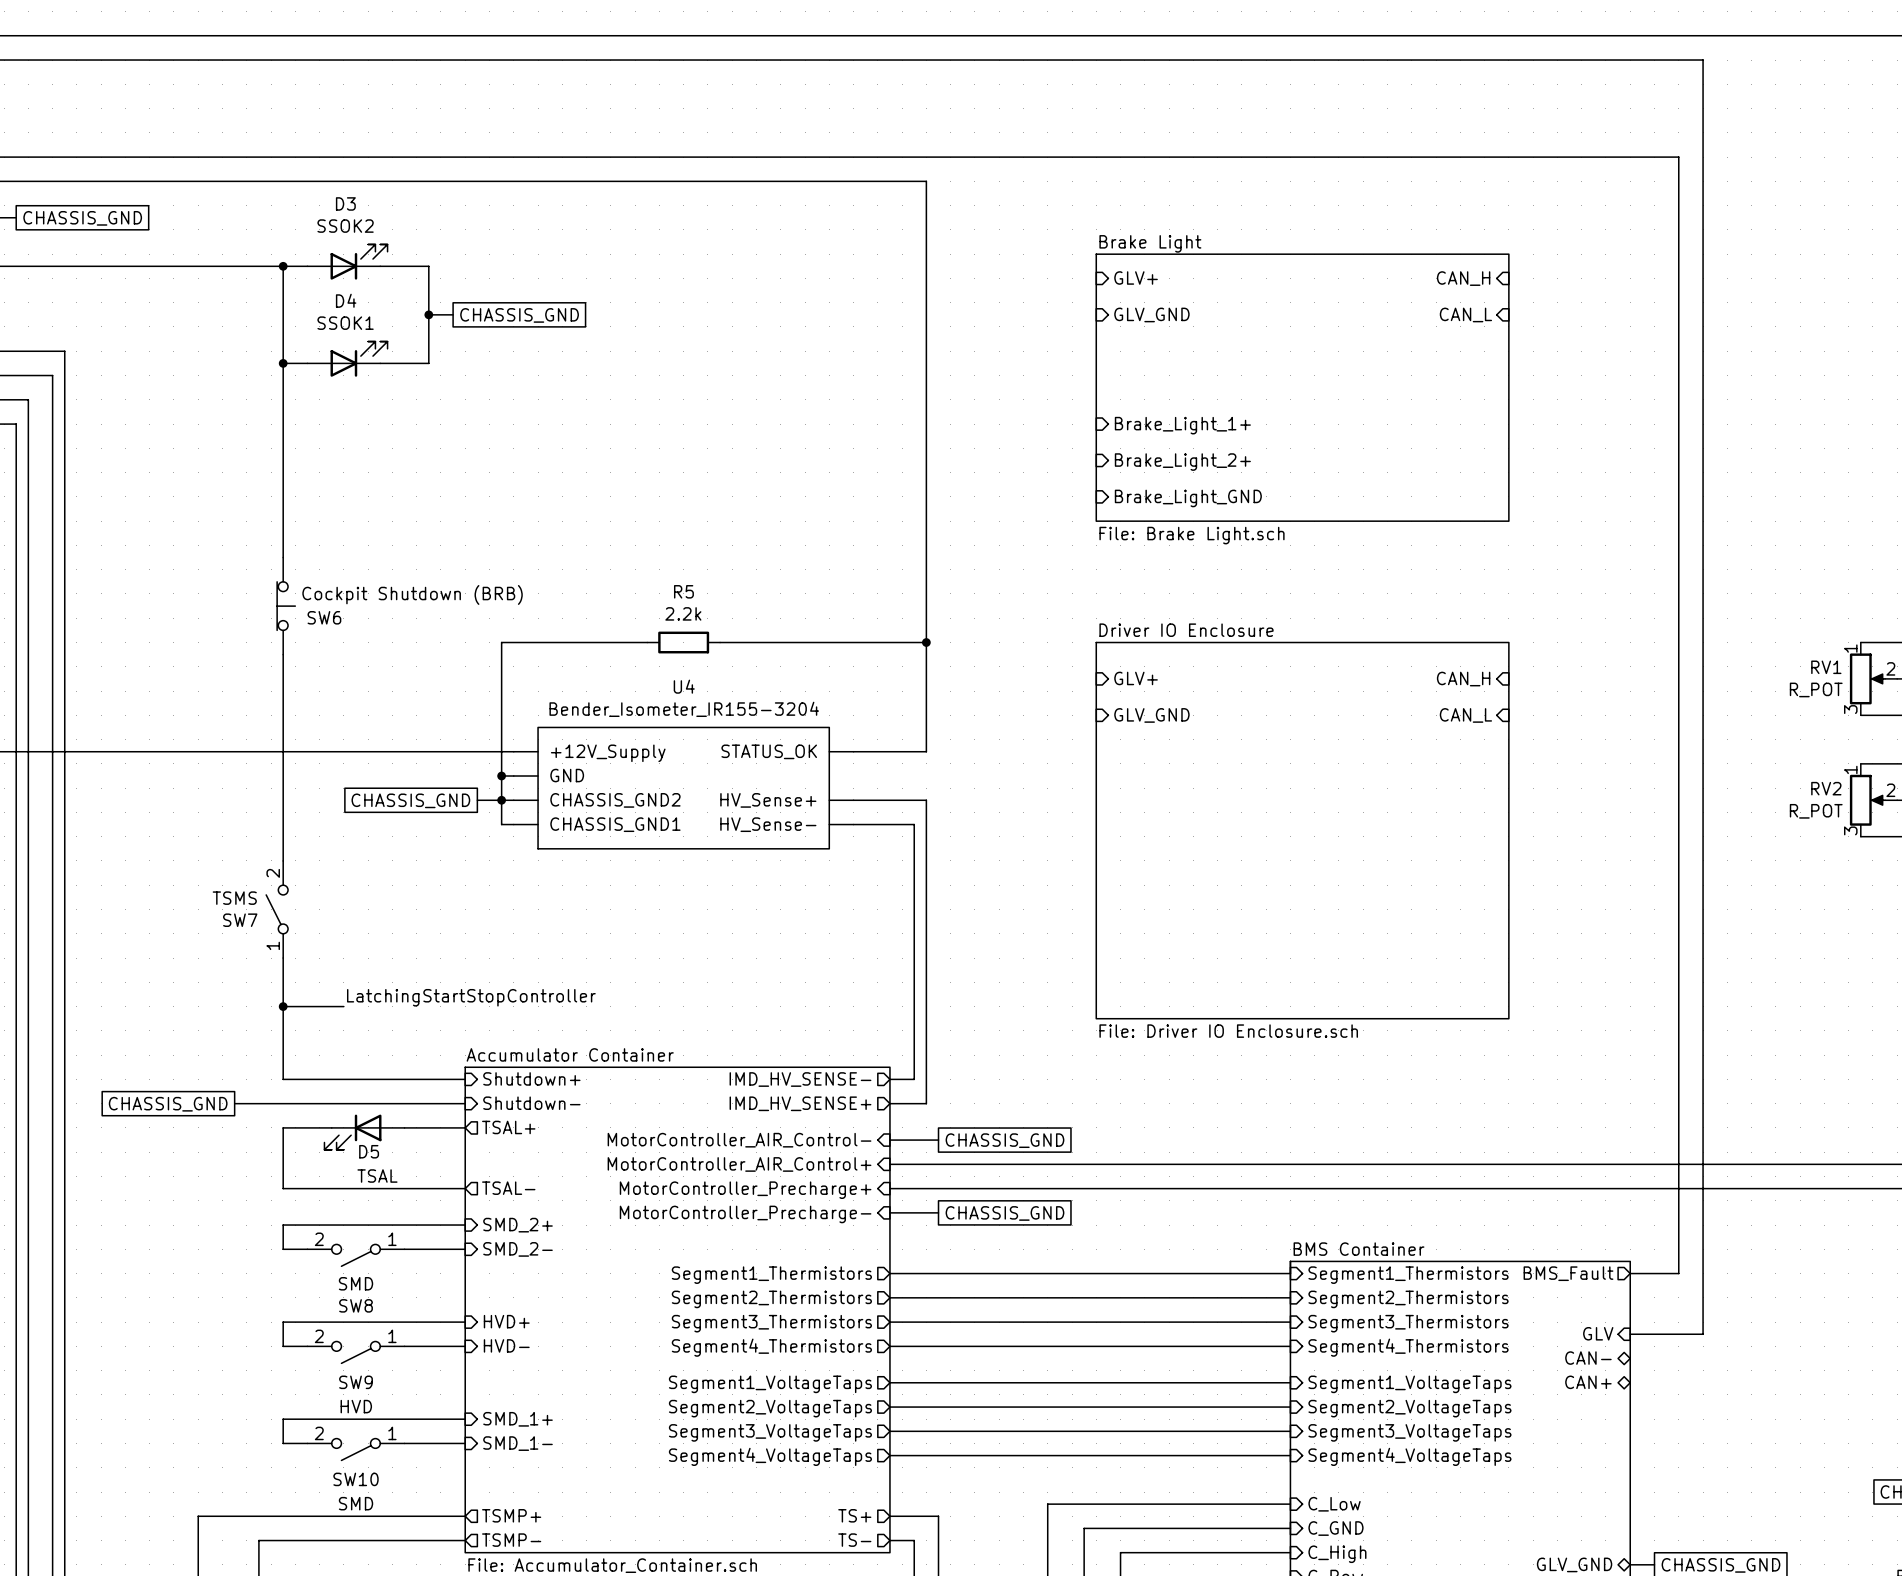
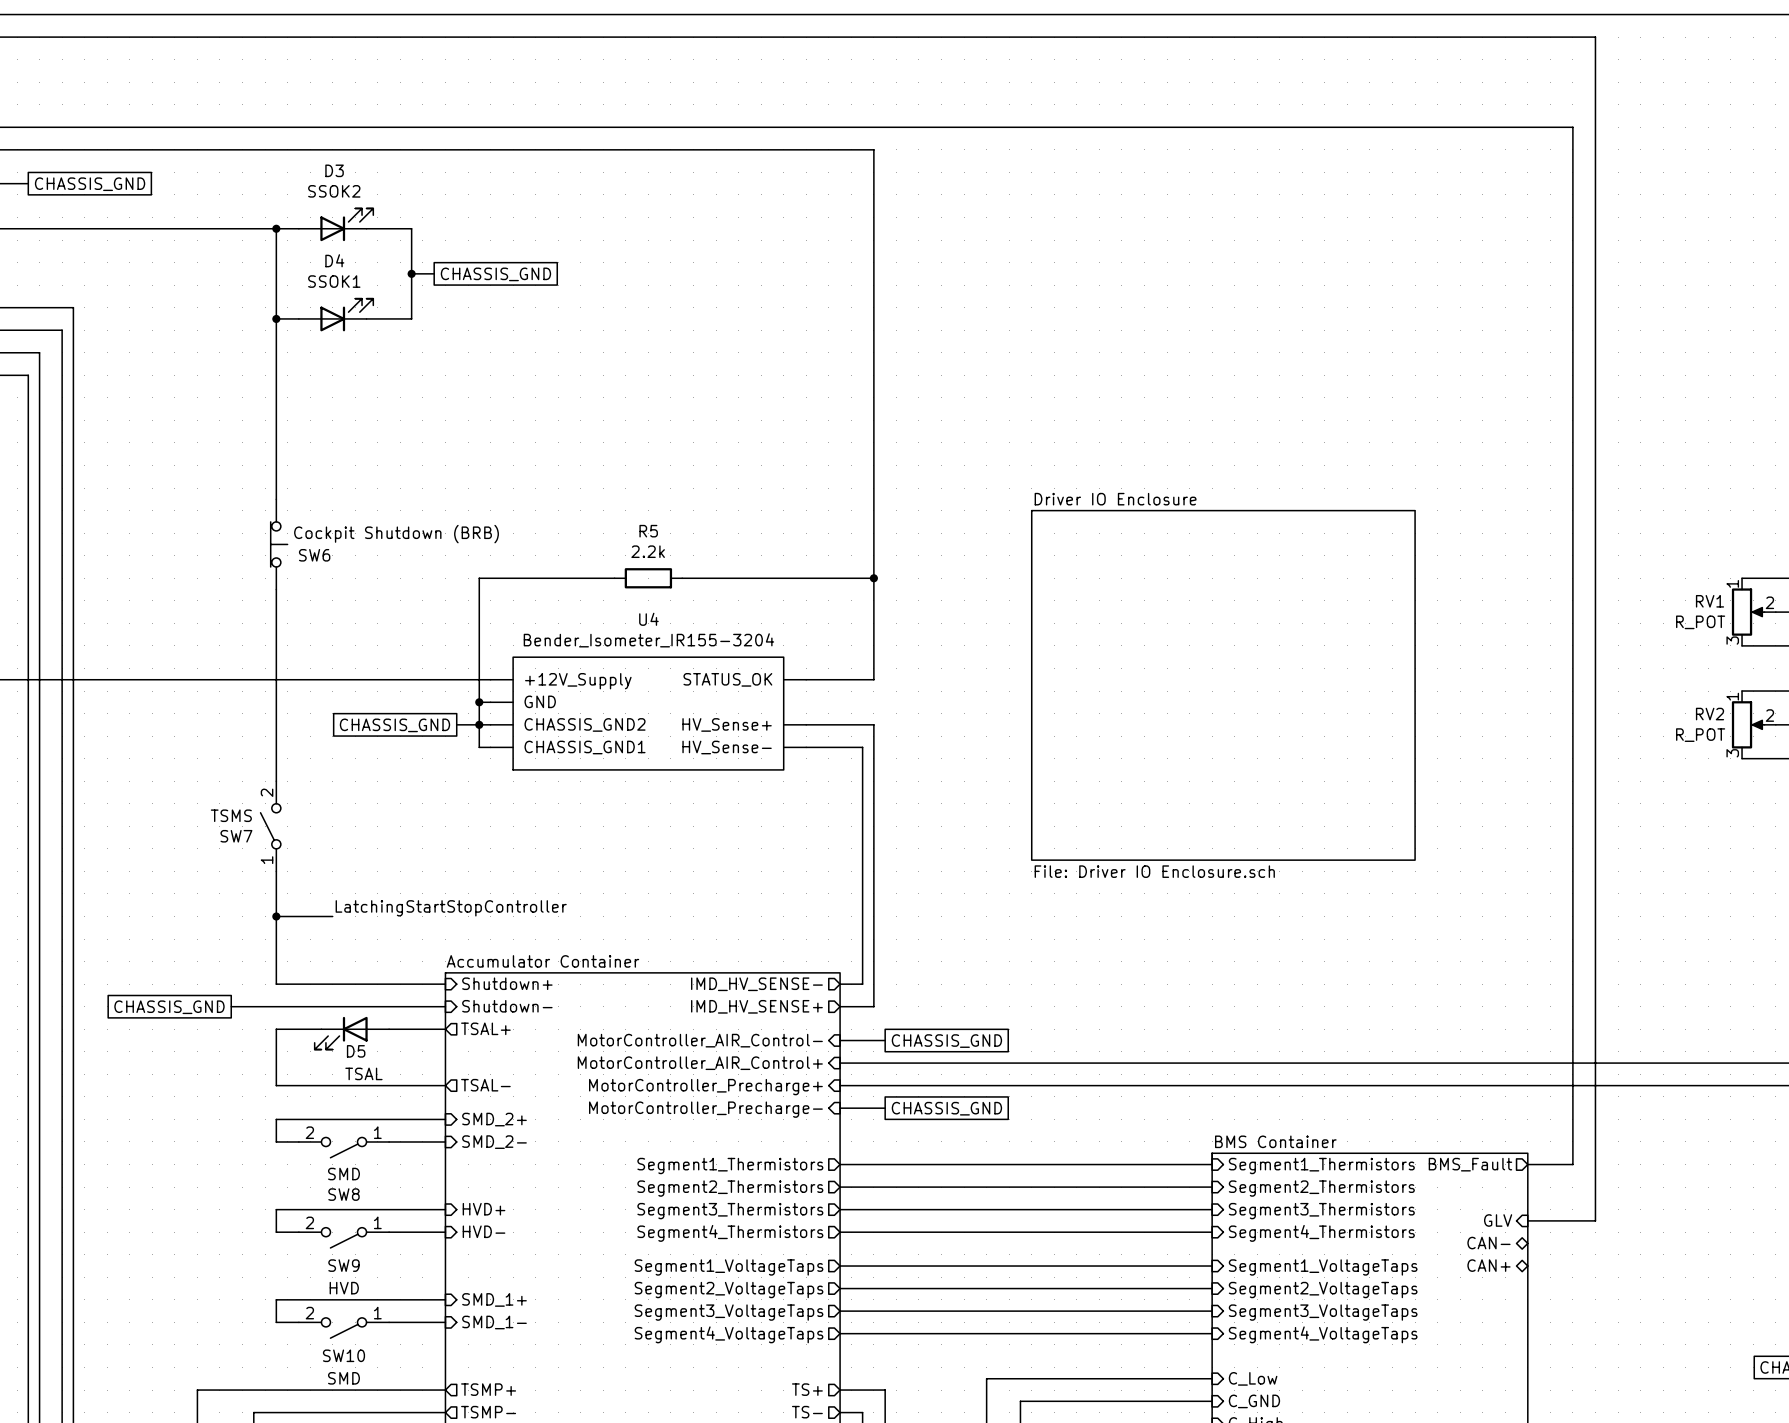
sheet pin: GLV+ (1136, 277) -> none
sheet pin: CAN_H (1463, 278) -> none
sheet pin: GLV_GND (1151, 314) -> none
sheet pin: CAN_L (1465, 314) -> none
sheet Brake Light: File: Brake Light.sch (1302, 387) -> none
sheet pin: Brake_Light_1+ (1182, 425) -> none
sheet pin: Brake_Light_2+ (1182, 462) -> none
sheet pin: Brake_Light_GND (1188, 498) -> none
sheet pin: GLV+ (1136, 678) -> none
sheet pin: CAN_H (1463, 679) -> none
sheet pin: GLV_GND (1151, 715) -> none
sheet pin: CAN_L (1465, 715) -> none
sheet Driver IO Enclosure position: (1302, 830) -> (1223, 685)

